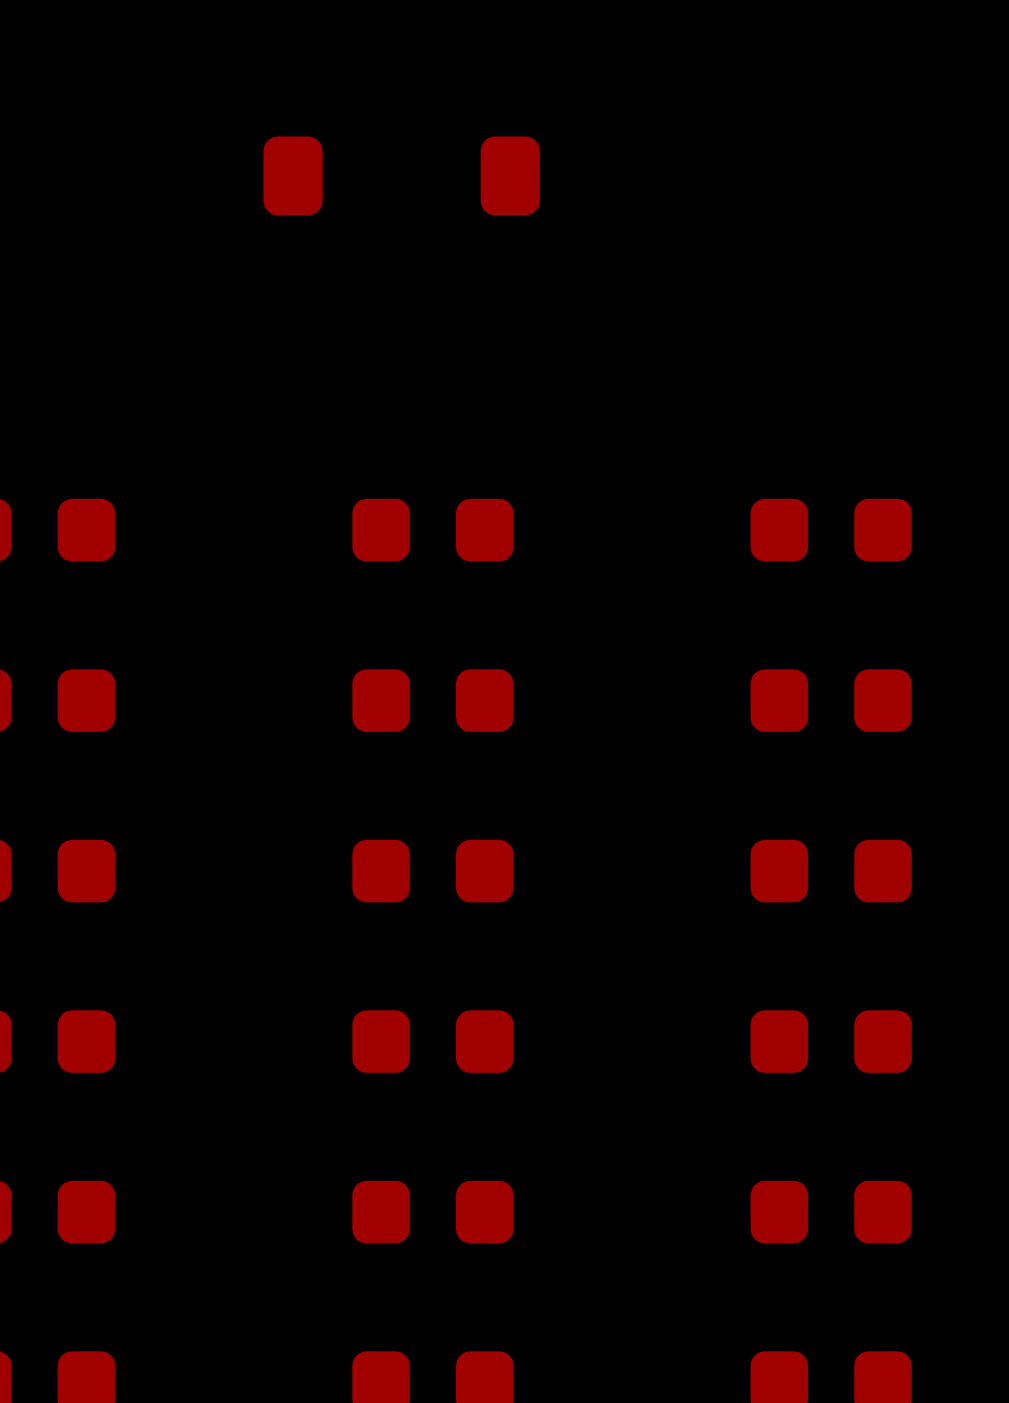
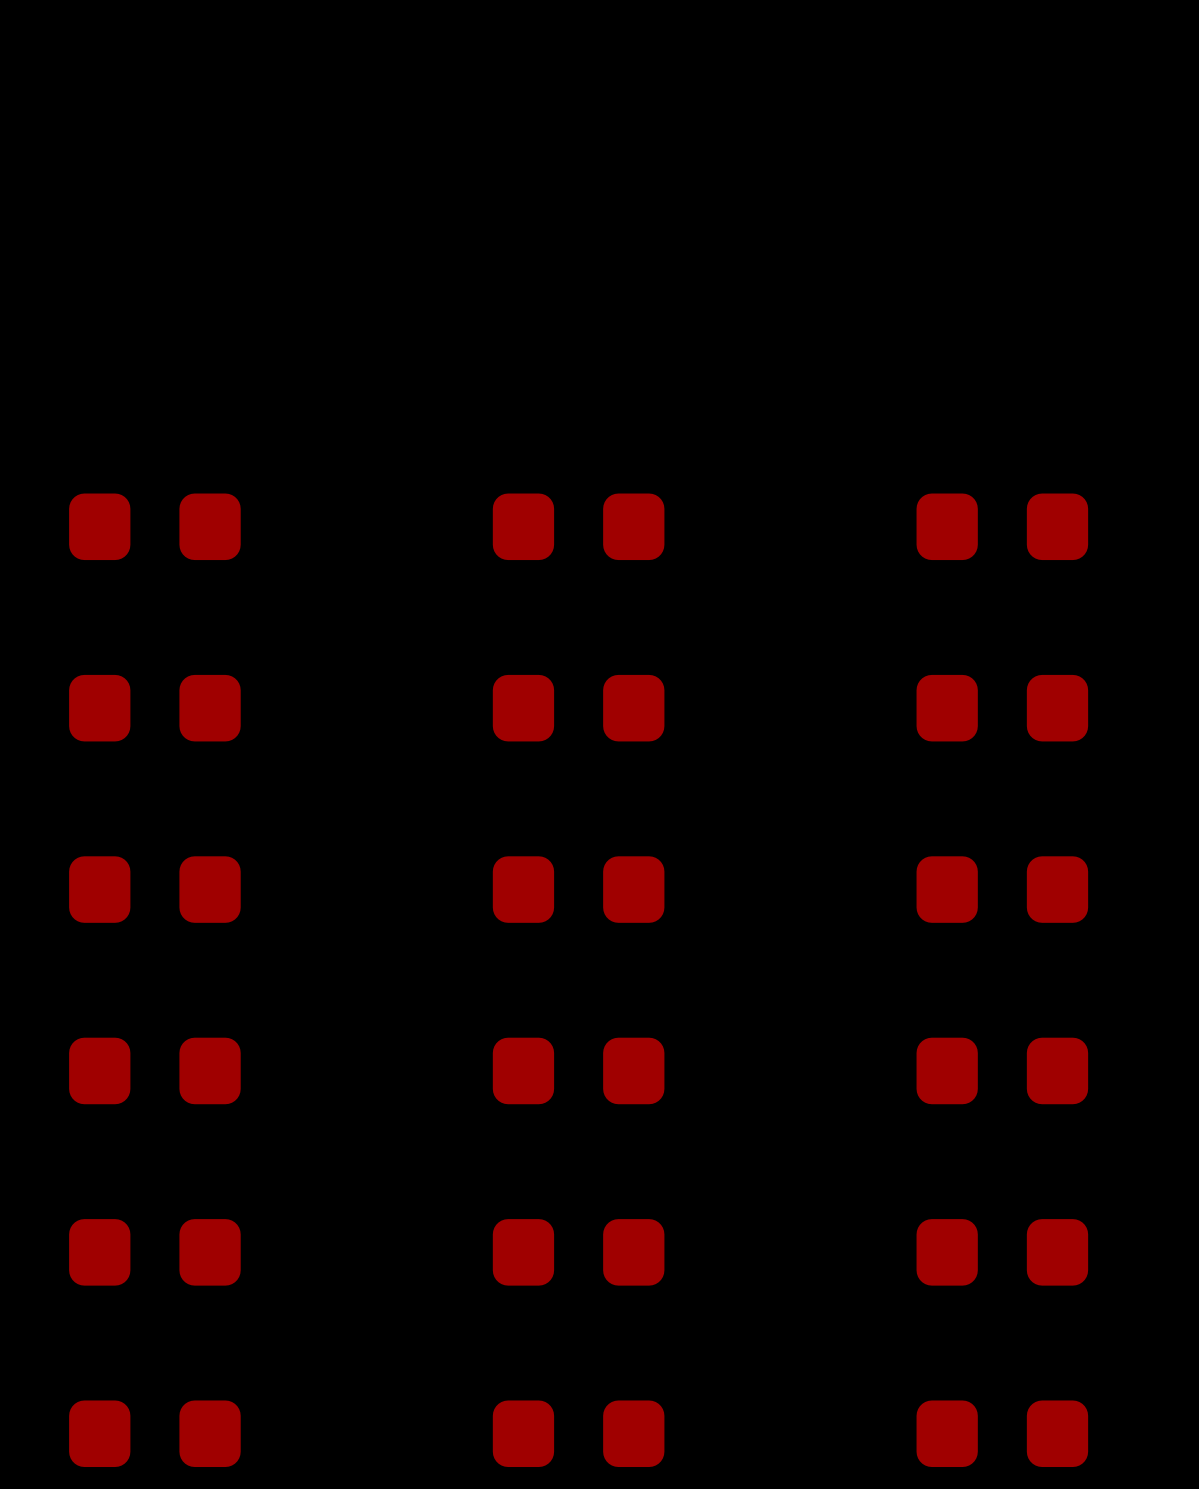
part: (401, 175) -> none

